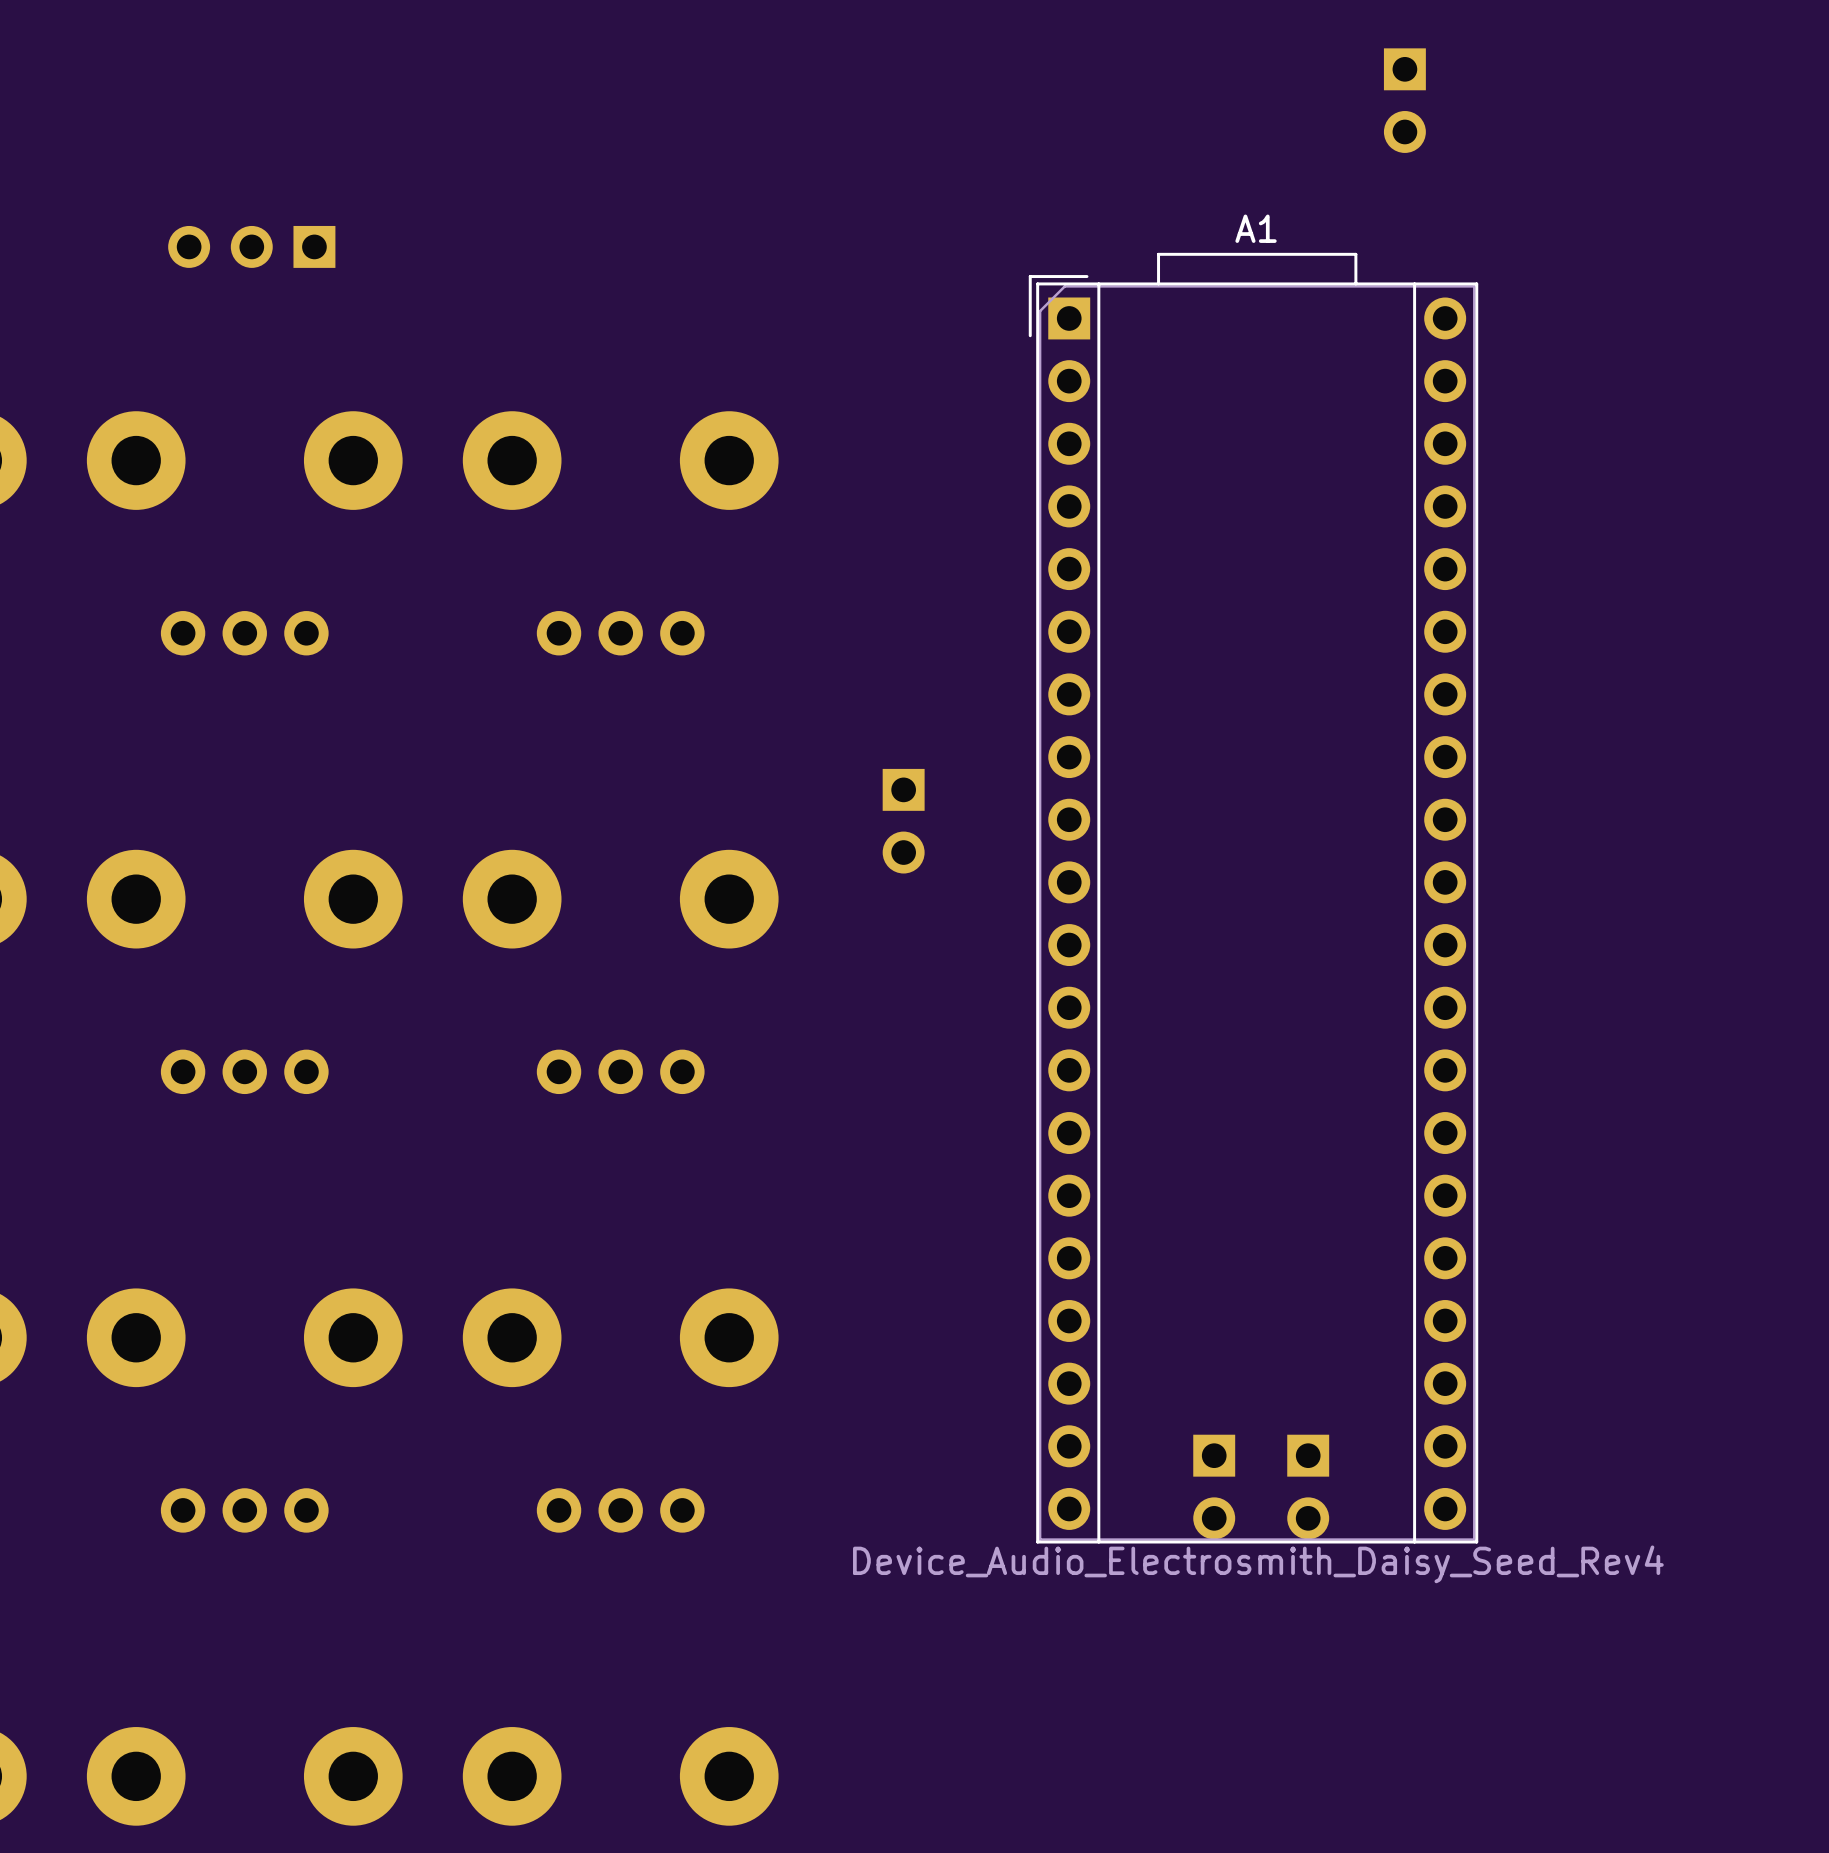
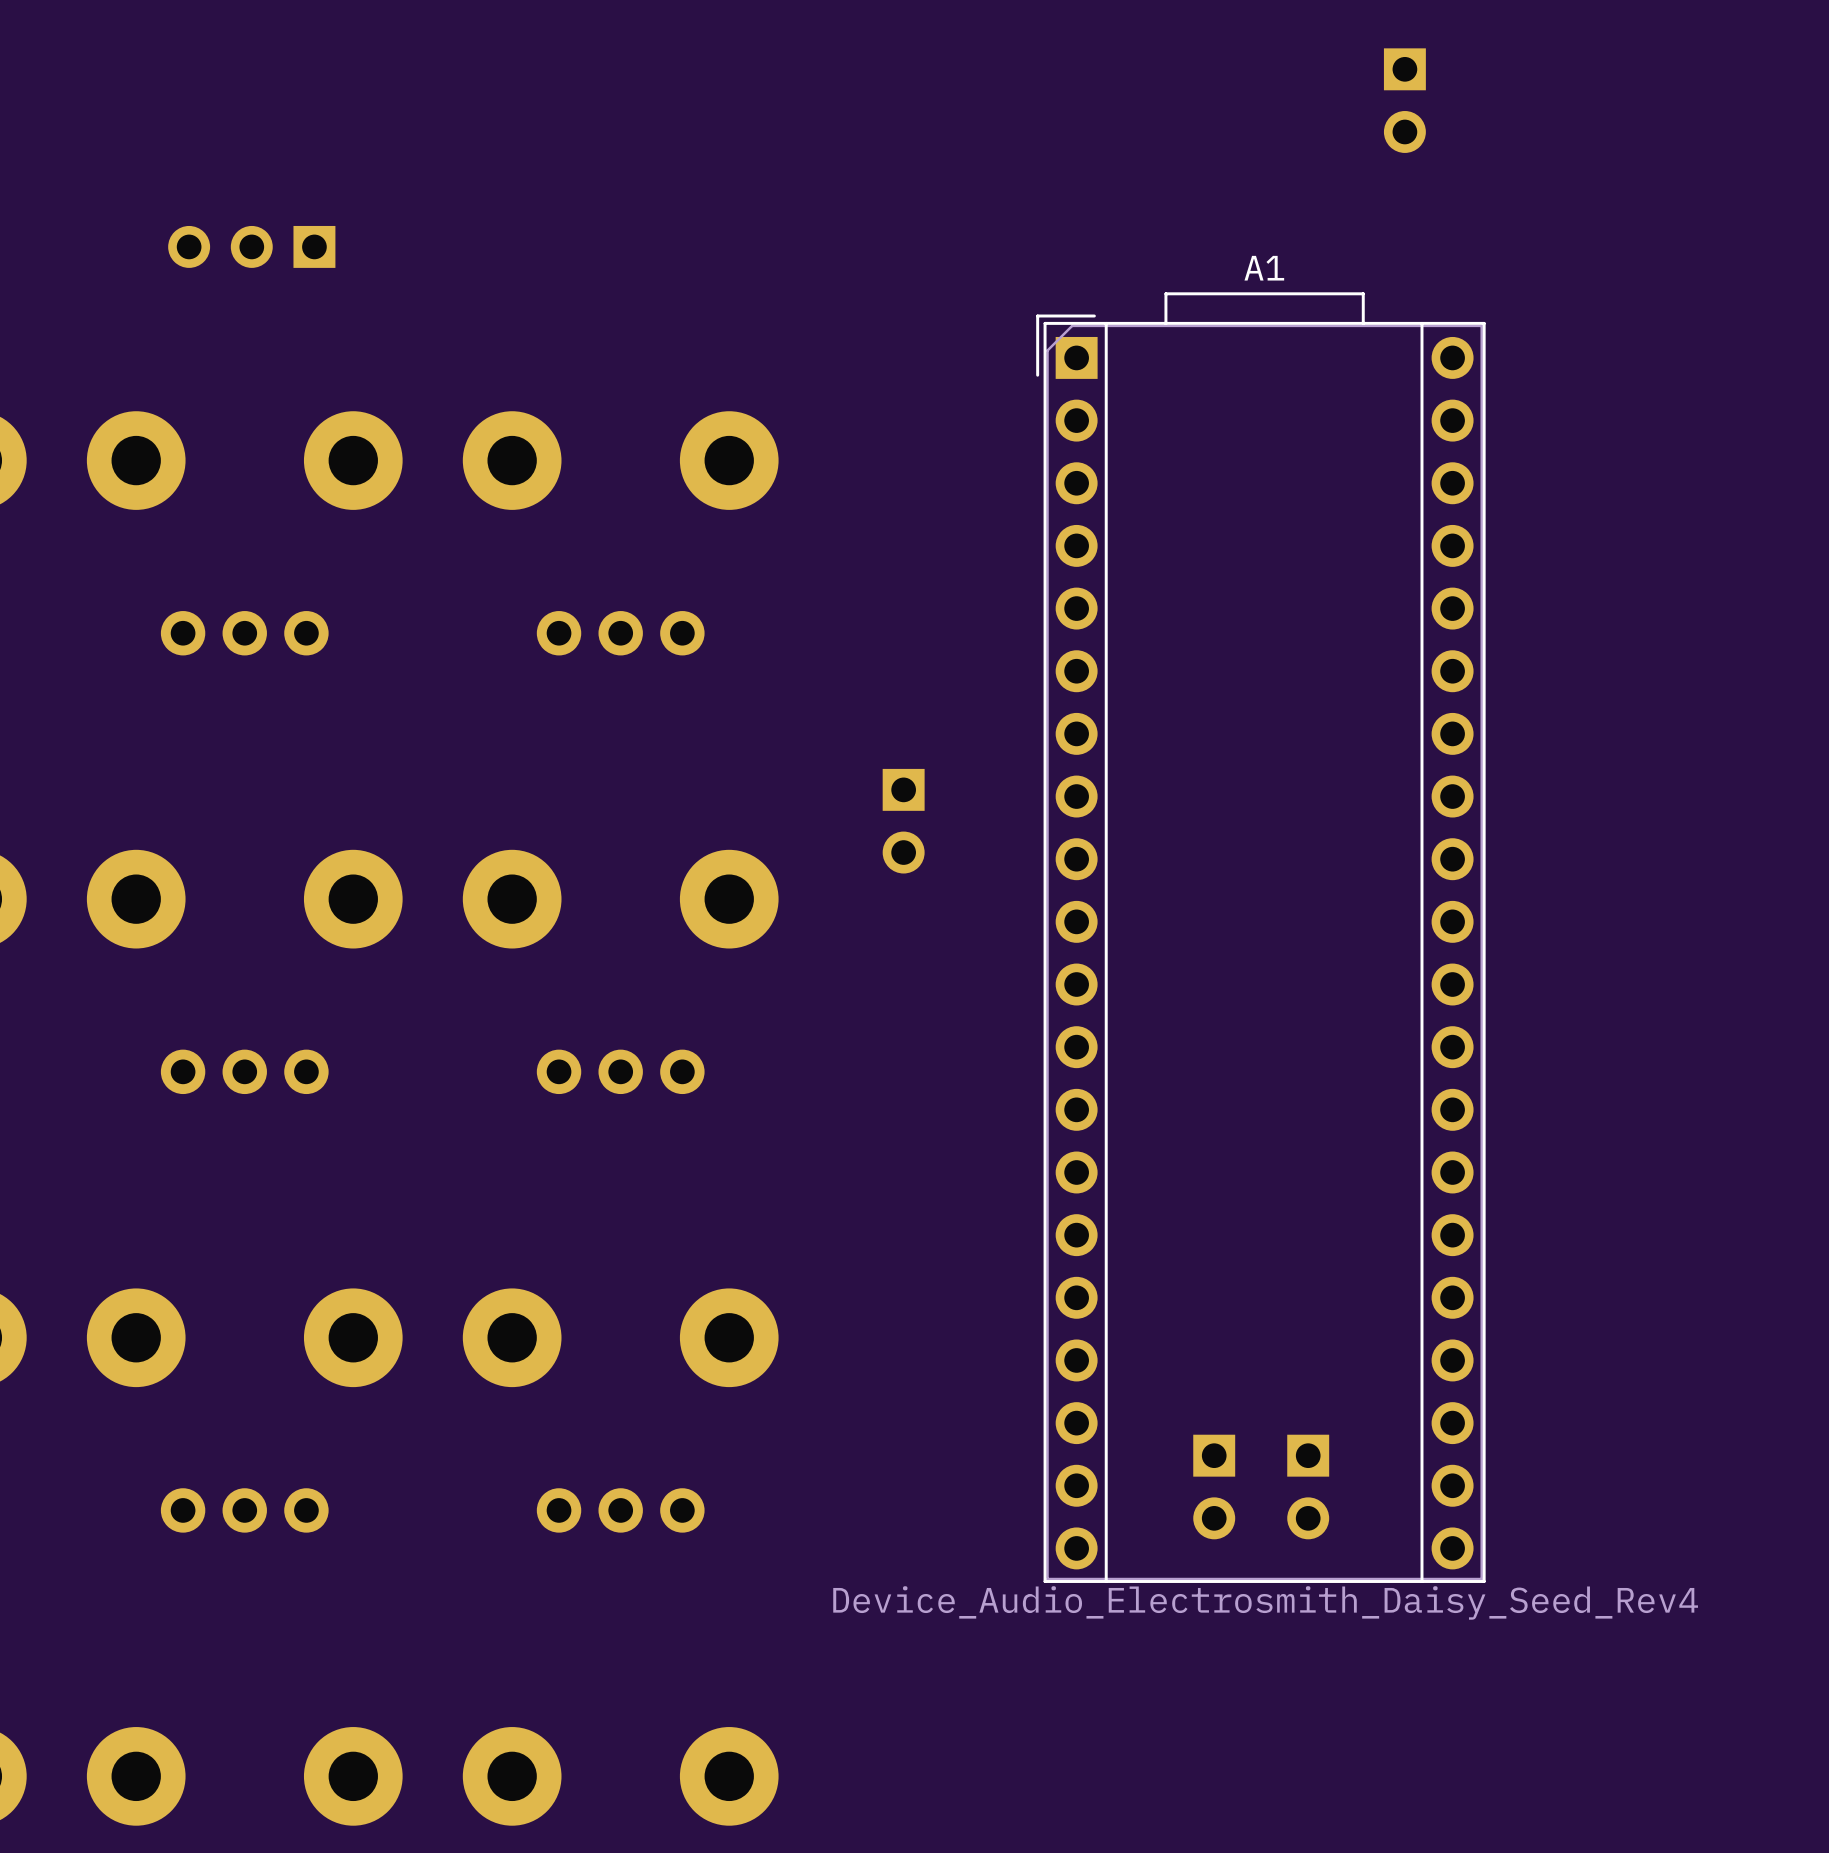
A1 position: (1253, 898) -> (1260, 937)

